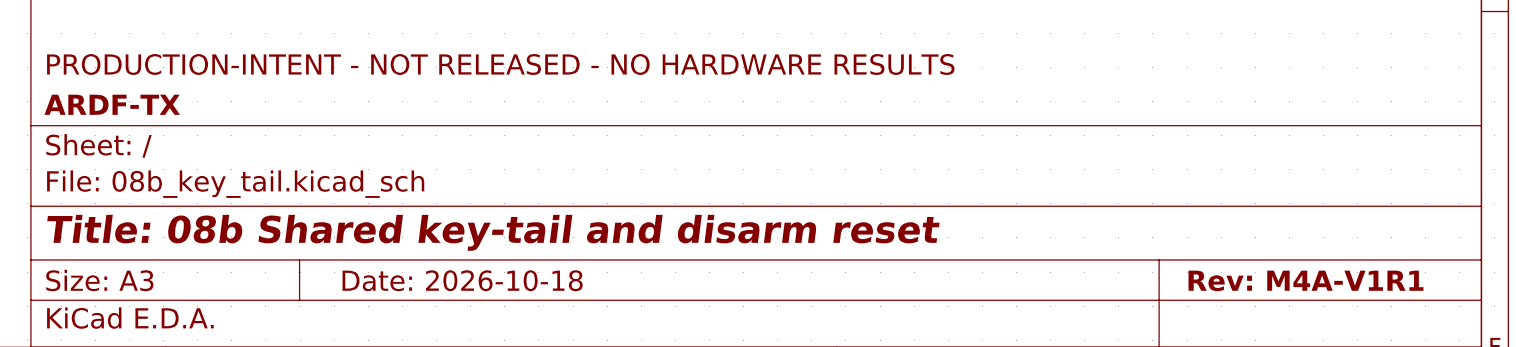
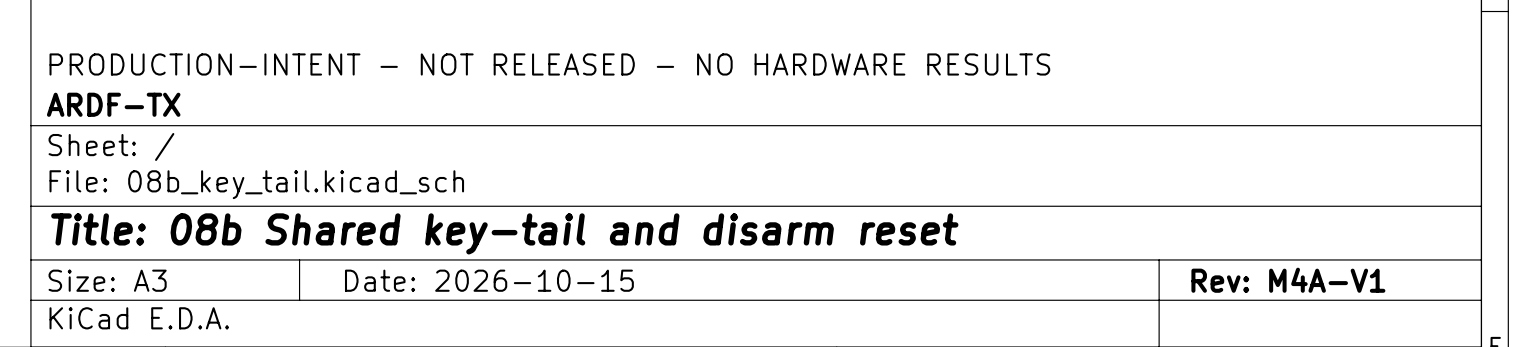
title block: Date: 2026-10-18 (462, 280) -> Date: 2026-10-15 (489, 280)
title block: Rev: M4A-V1R1 (1306, 280) -> Rev: M4A-V1 (1288, 280)

